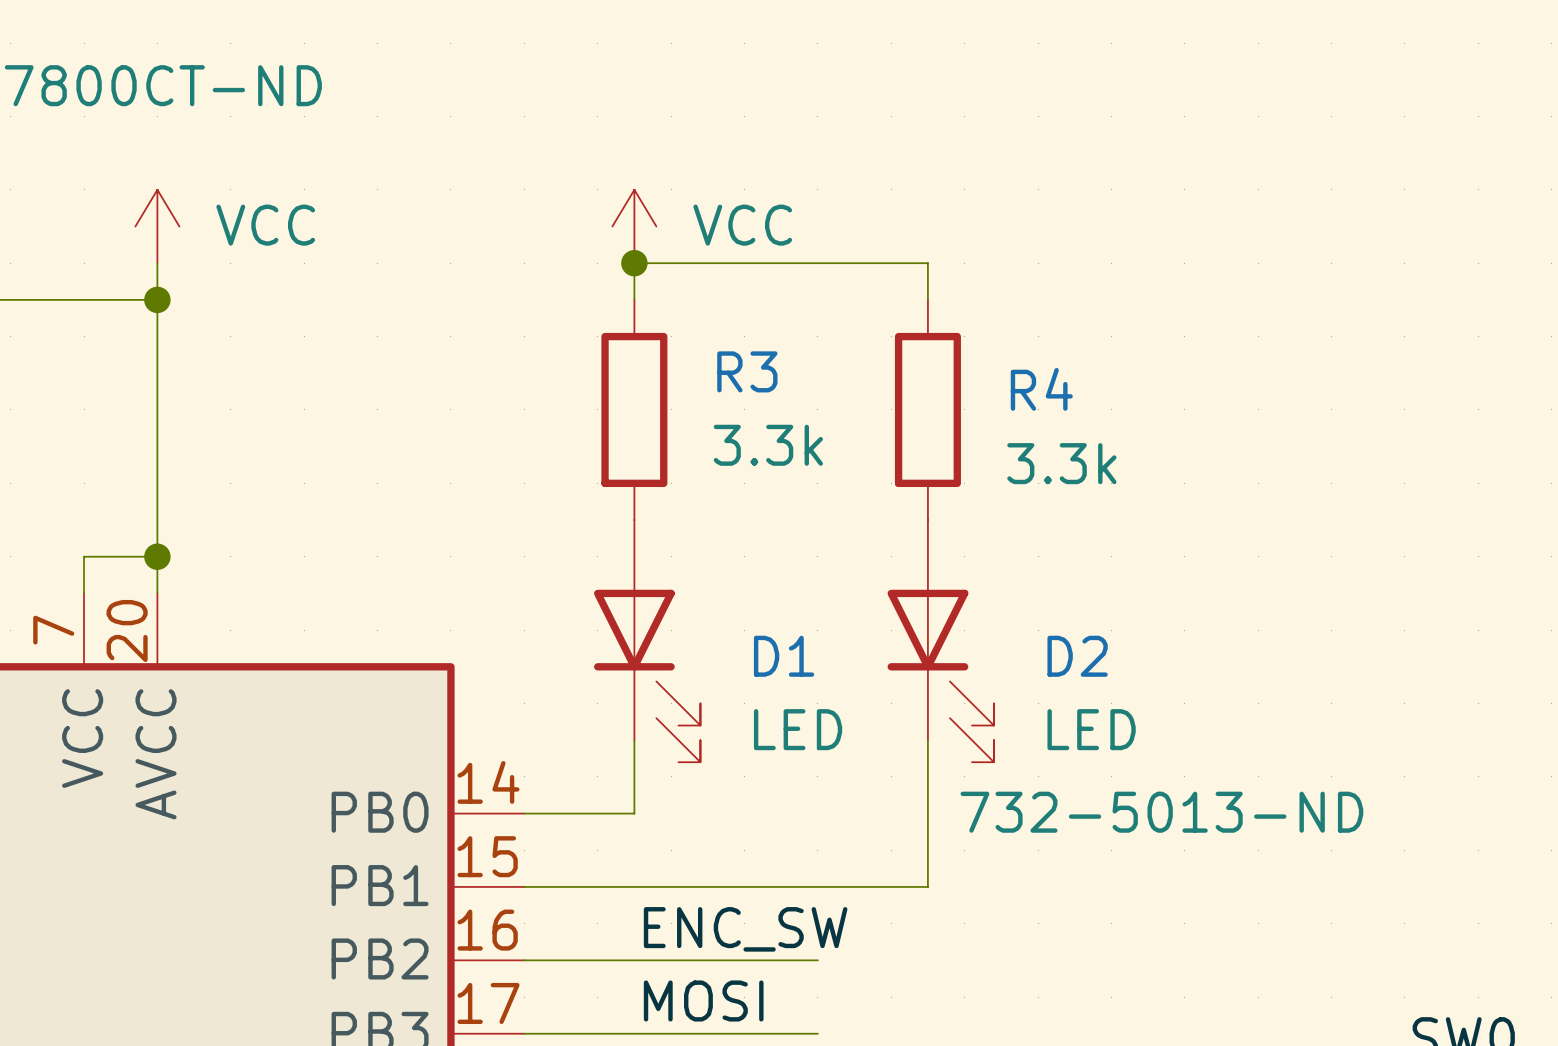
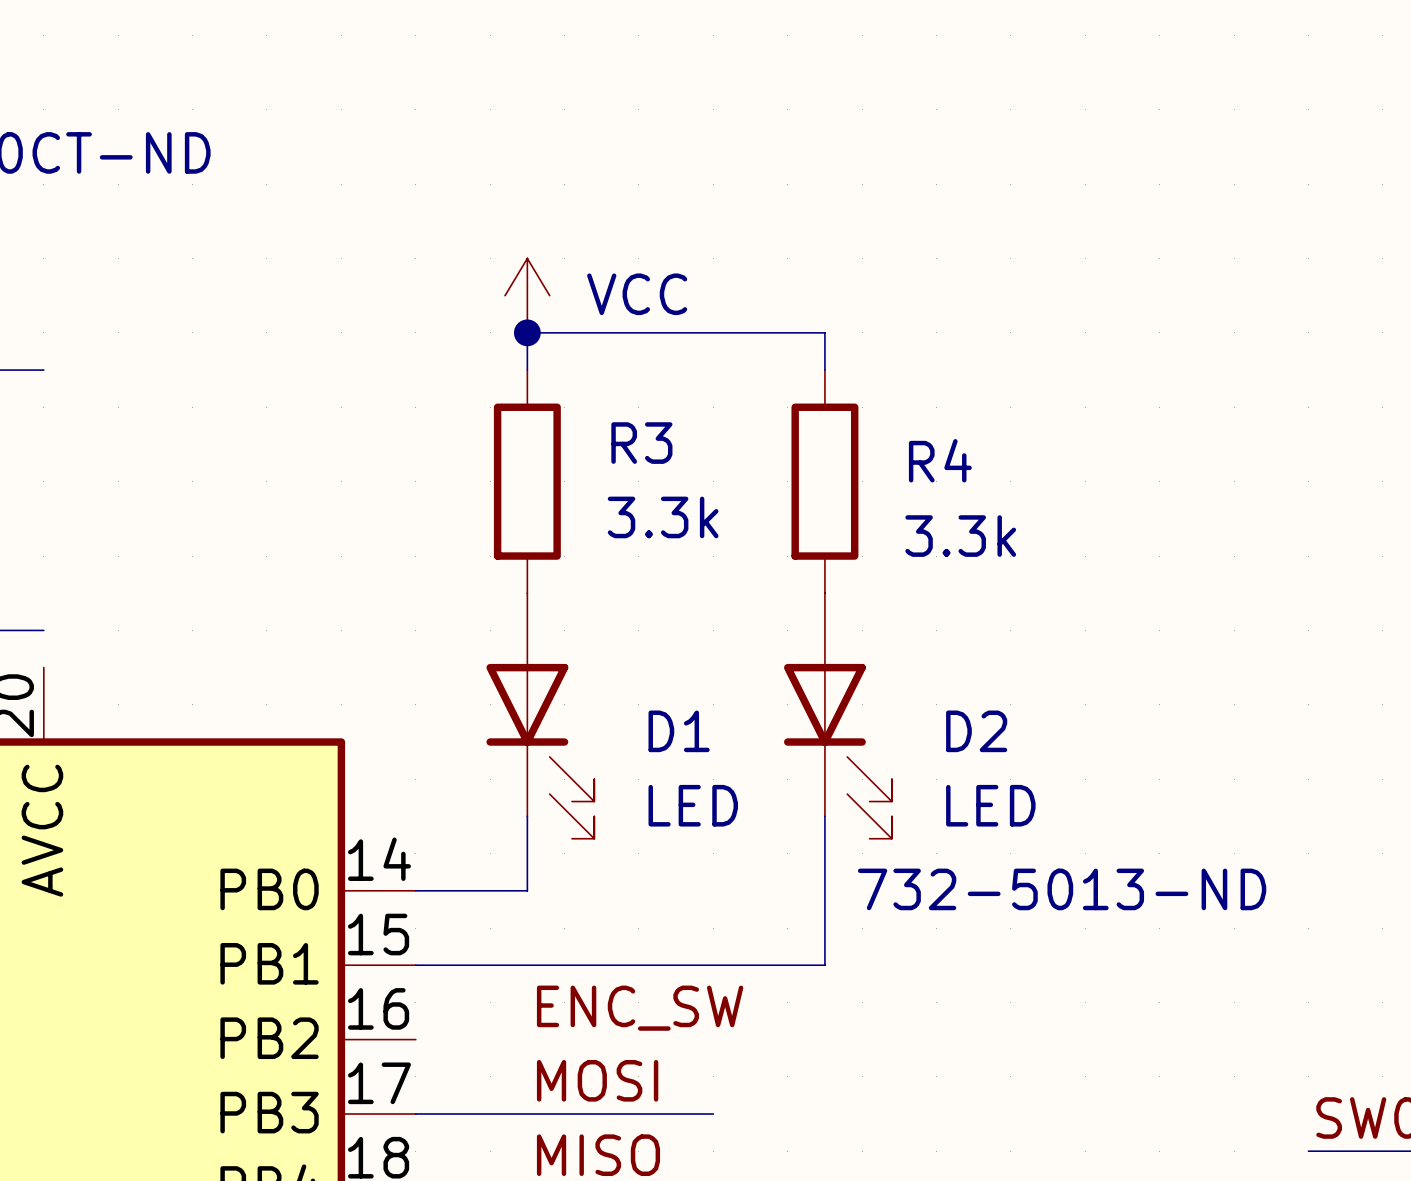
power symbol: VCC (157, 226) -> none
wire: (157, 263) (157, 593) -> none
junction: (157, 299) -> none
junction: (157, 556) -> none
wire: (524, 960) (817, 960) -> none

